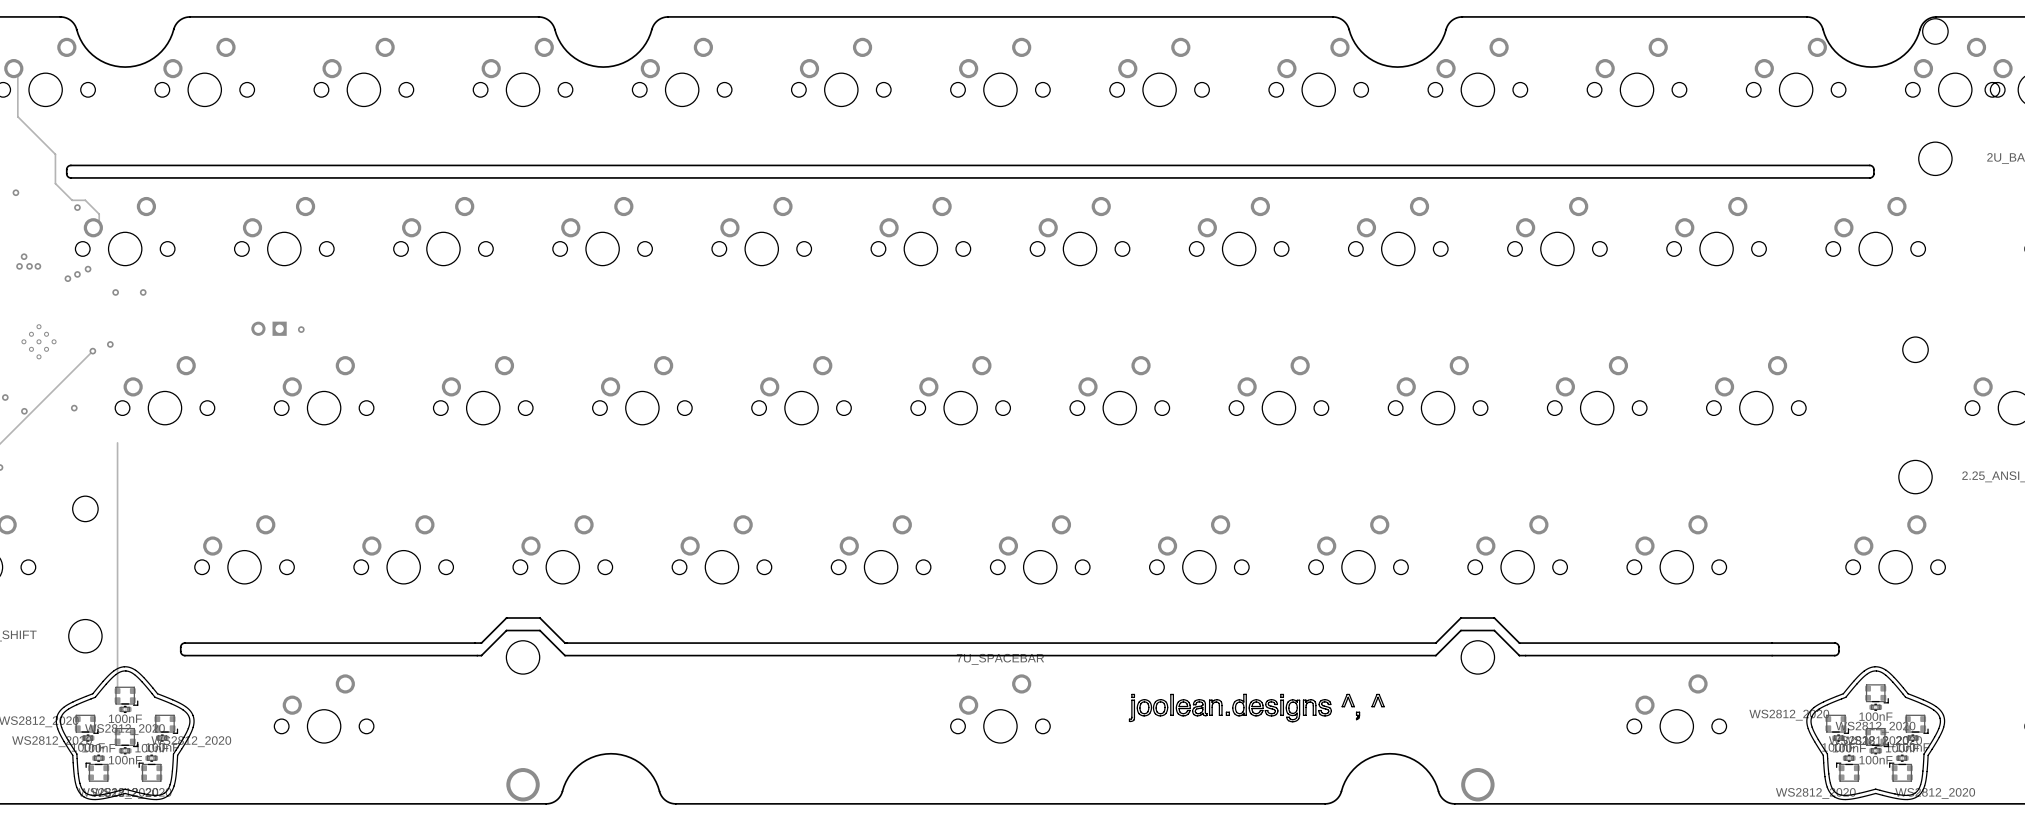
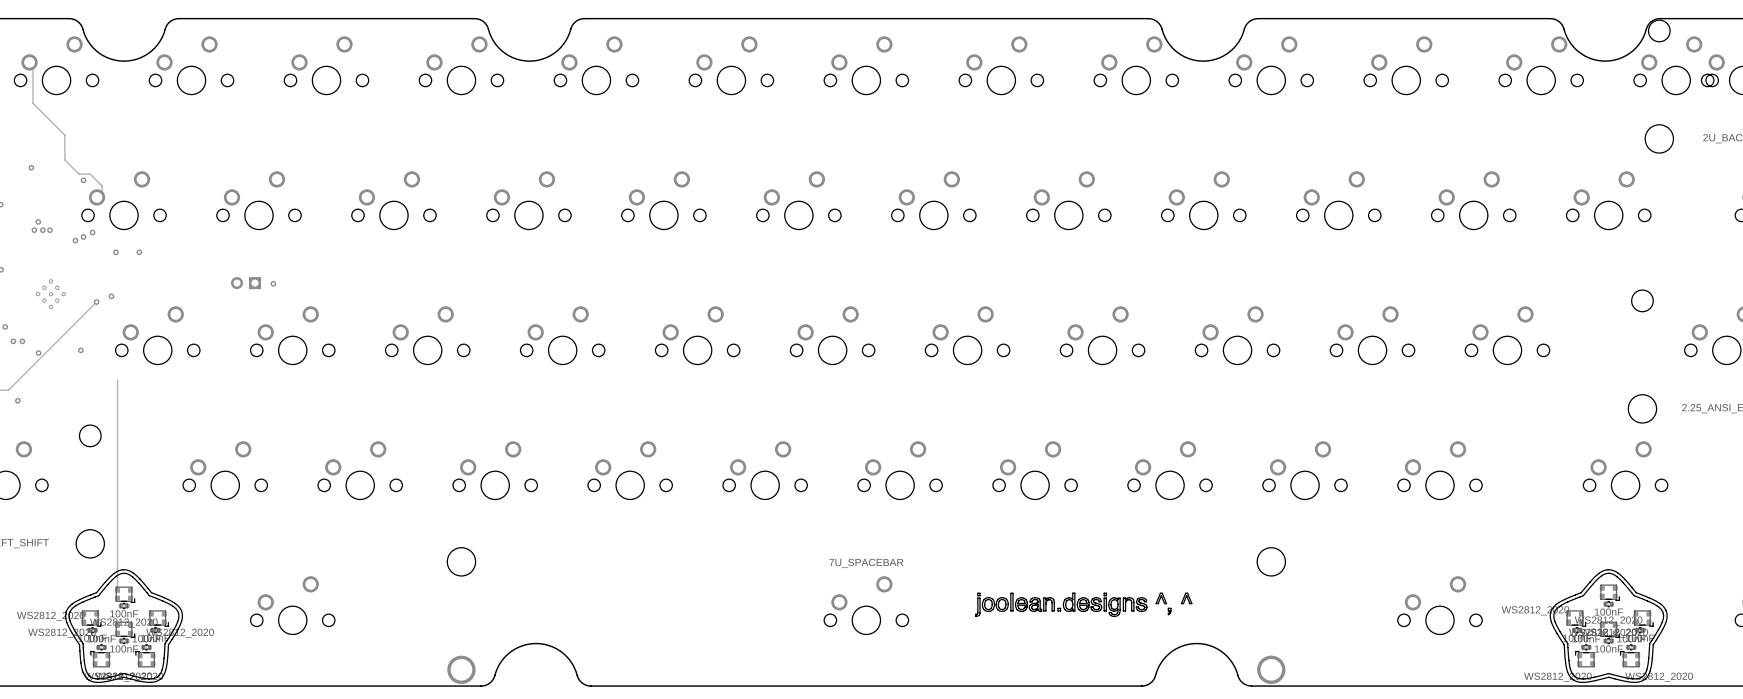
board edge: (70, 165) (1869, 165) (1873, 167) (1873, 173) (1869, 177) (70, 177) (67, 175) (66, 169) (70, 165) -> none
board edge: (506, 617) (539, 617) (565, 643) (1435, 643) (1460, 617) (1494, 617) (1519, 643) (1834, 643) (1838, 645) (1838, 651) (1834, 655) (1519, 655) (1494, 630) (1460, 630) (1435, 655) (565, 655) (539, 630) (506, 630) (481, 655) (184, 655) (180, 651) (181, 645) (184, 643) (481, 643) (506, 617) -> none

